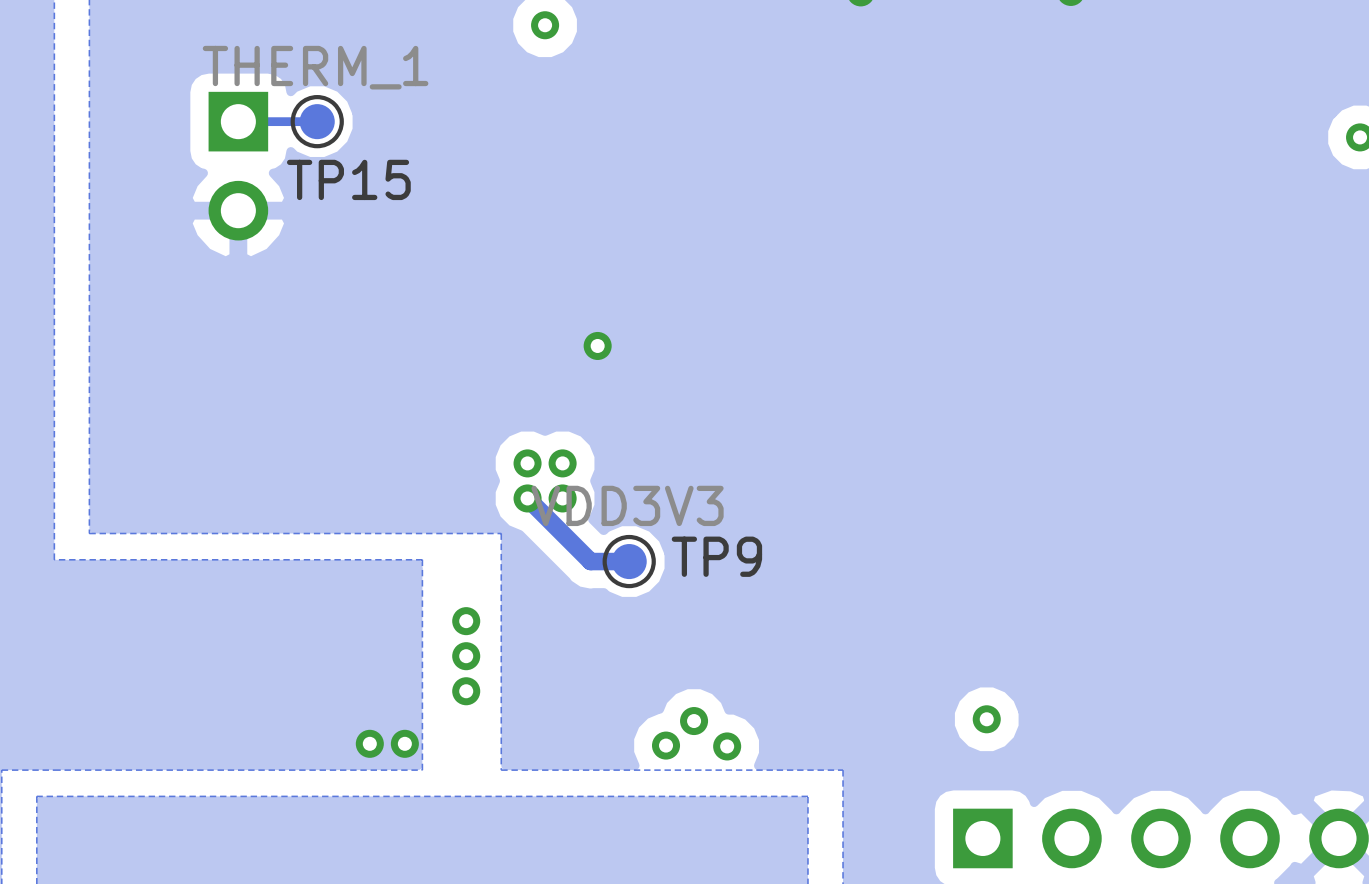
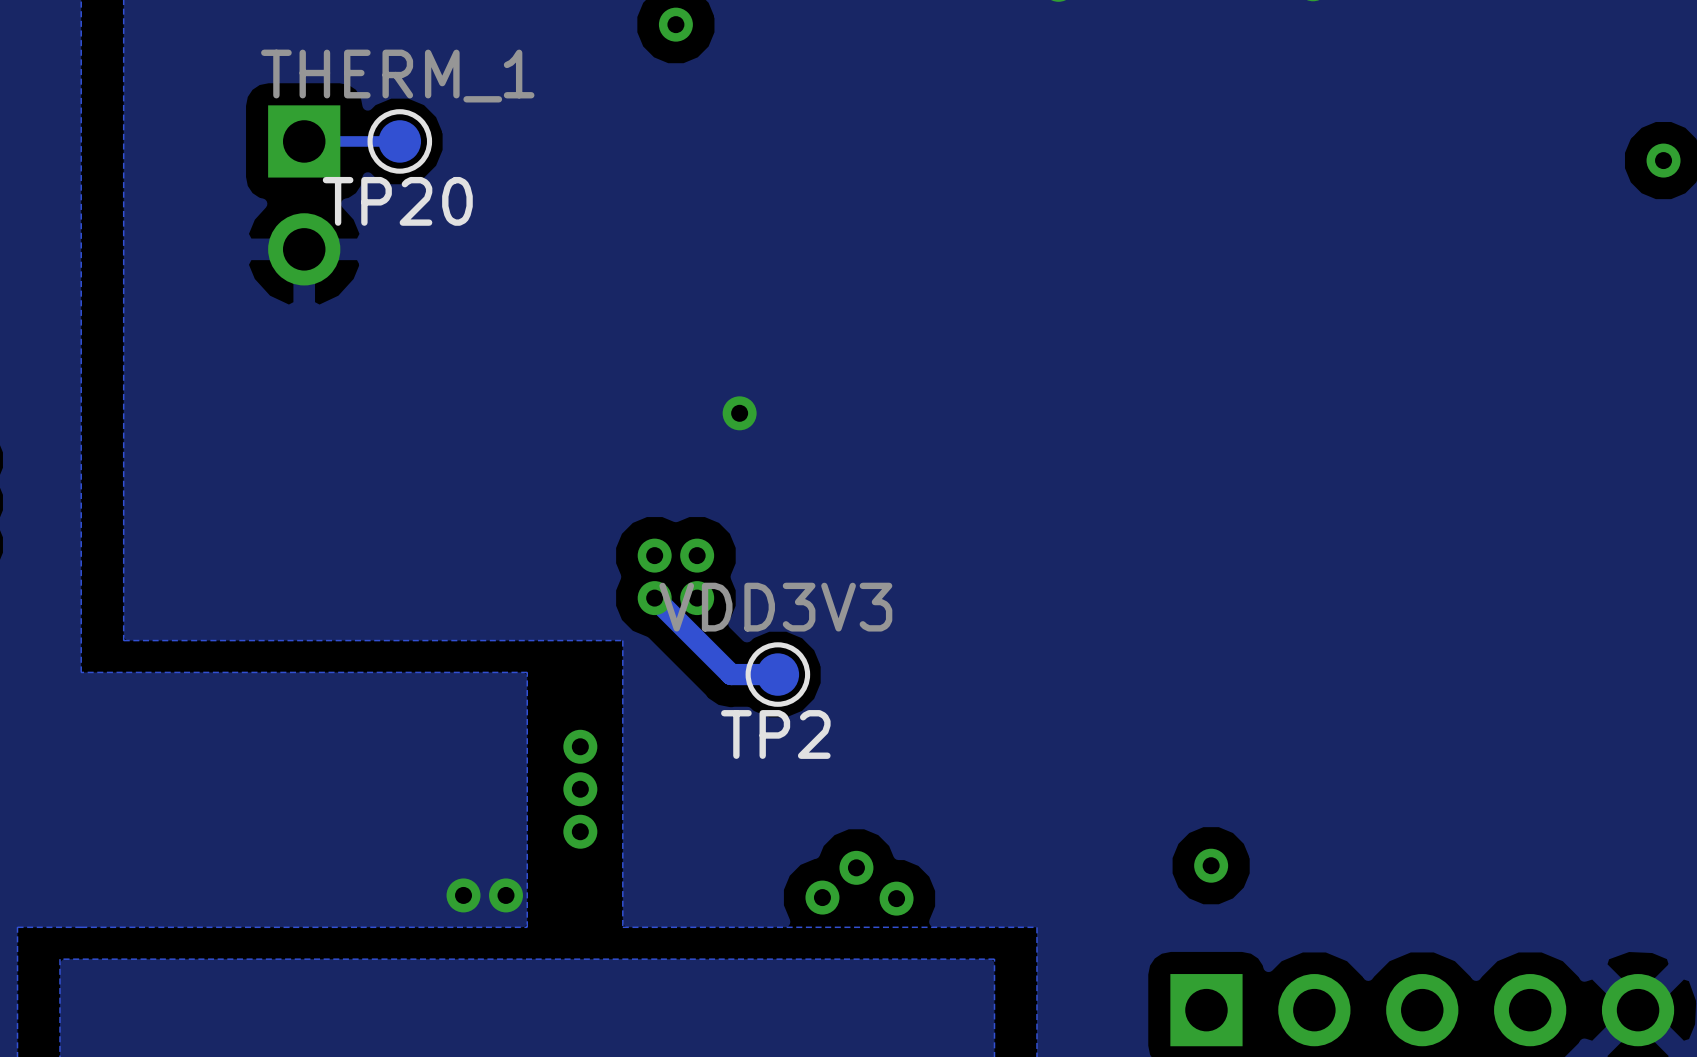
TP15 name: TP15 (348, 179) -> TP20 (397, 201)
TP9 name: TP9 (716, 556) -> TP2 (775, 734)

